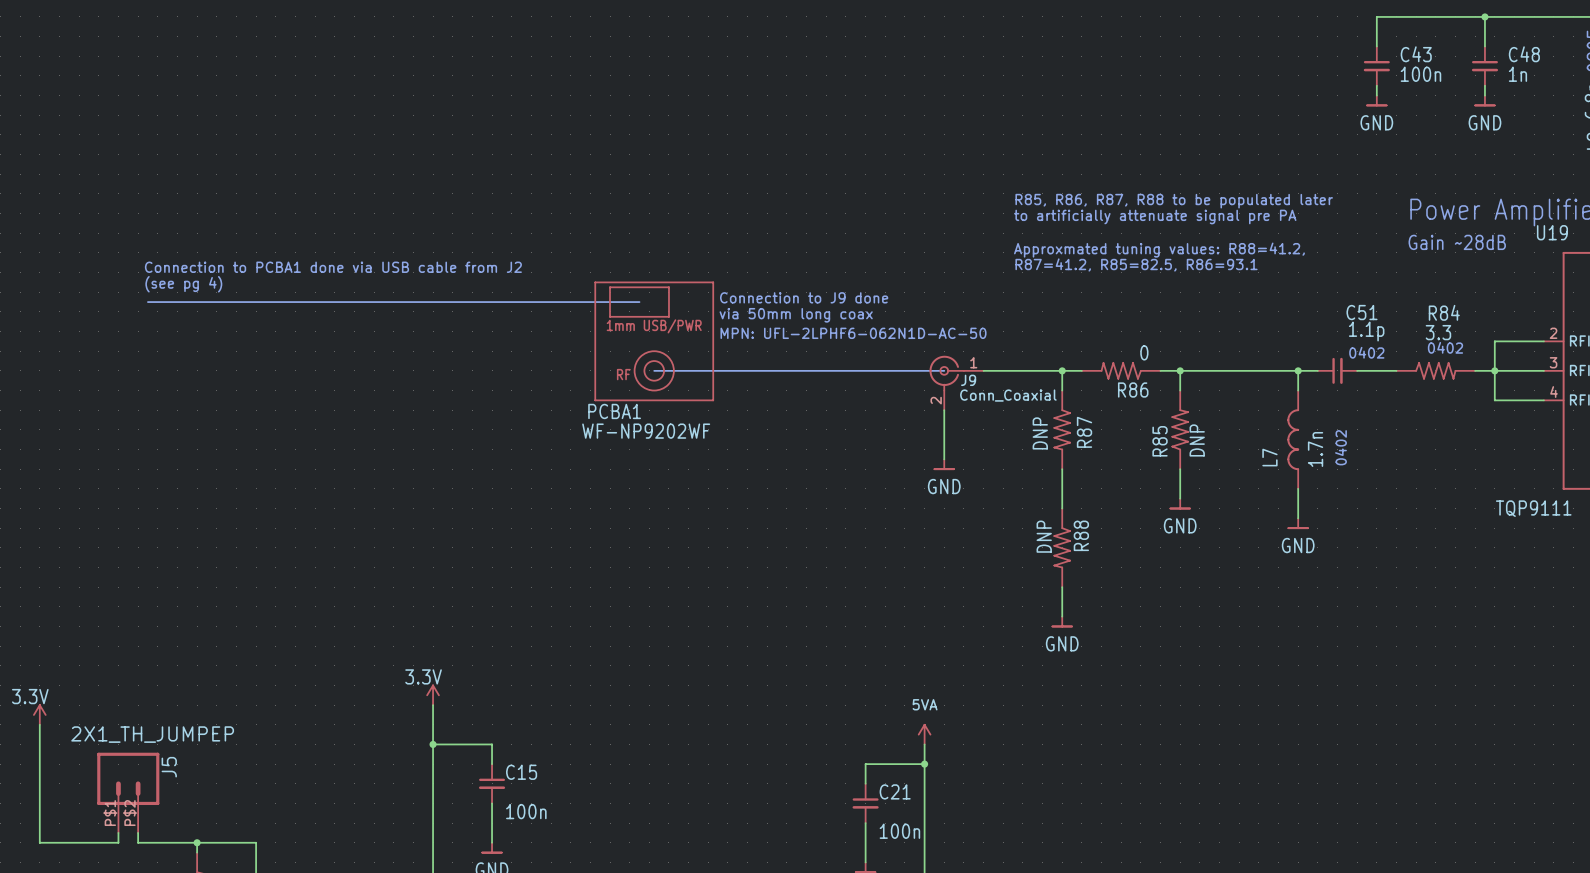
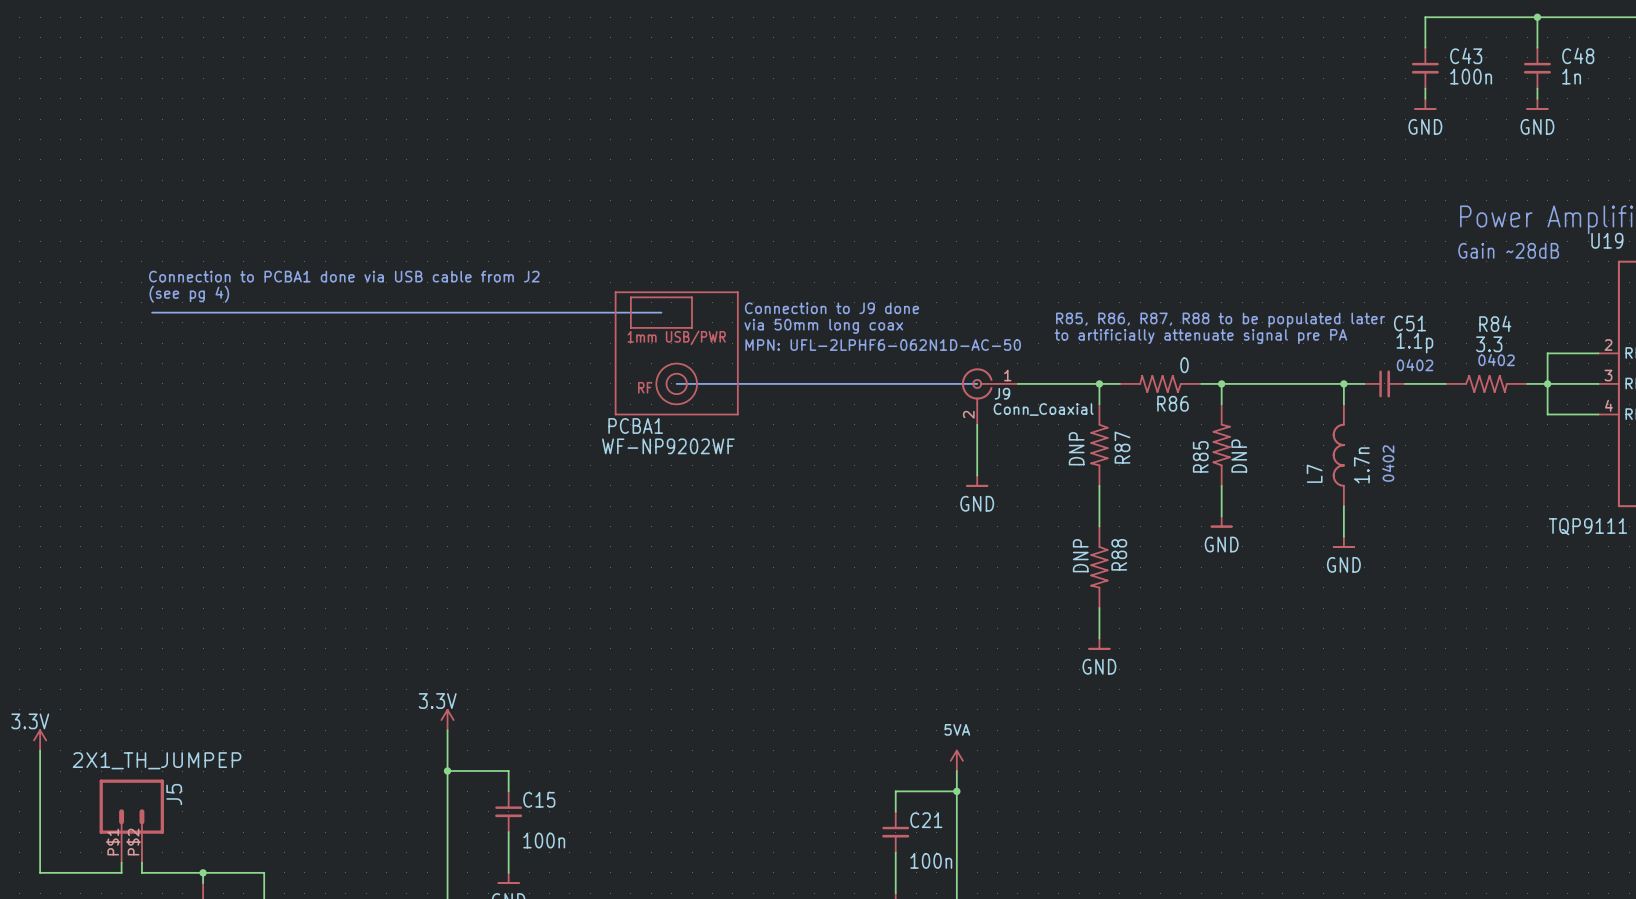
text position: R85, R86, R87, R88 to be populated later (1174, 201) -> R85, R86, R87, R88 to be populated later (1220, 320)
text position: to artificially attenuate signal pre PA (1155, 216) -> to artificially attenuate signal pre PA (1200, 336)
text: Approxmated tuning values: R88=41.2, (1159, 250) -> none
text: R87=41.2, R85=82.5, R86=93.1 (1136, 264) -> none

